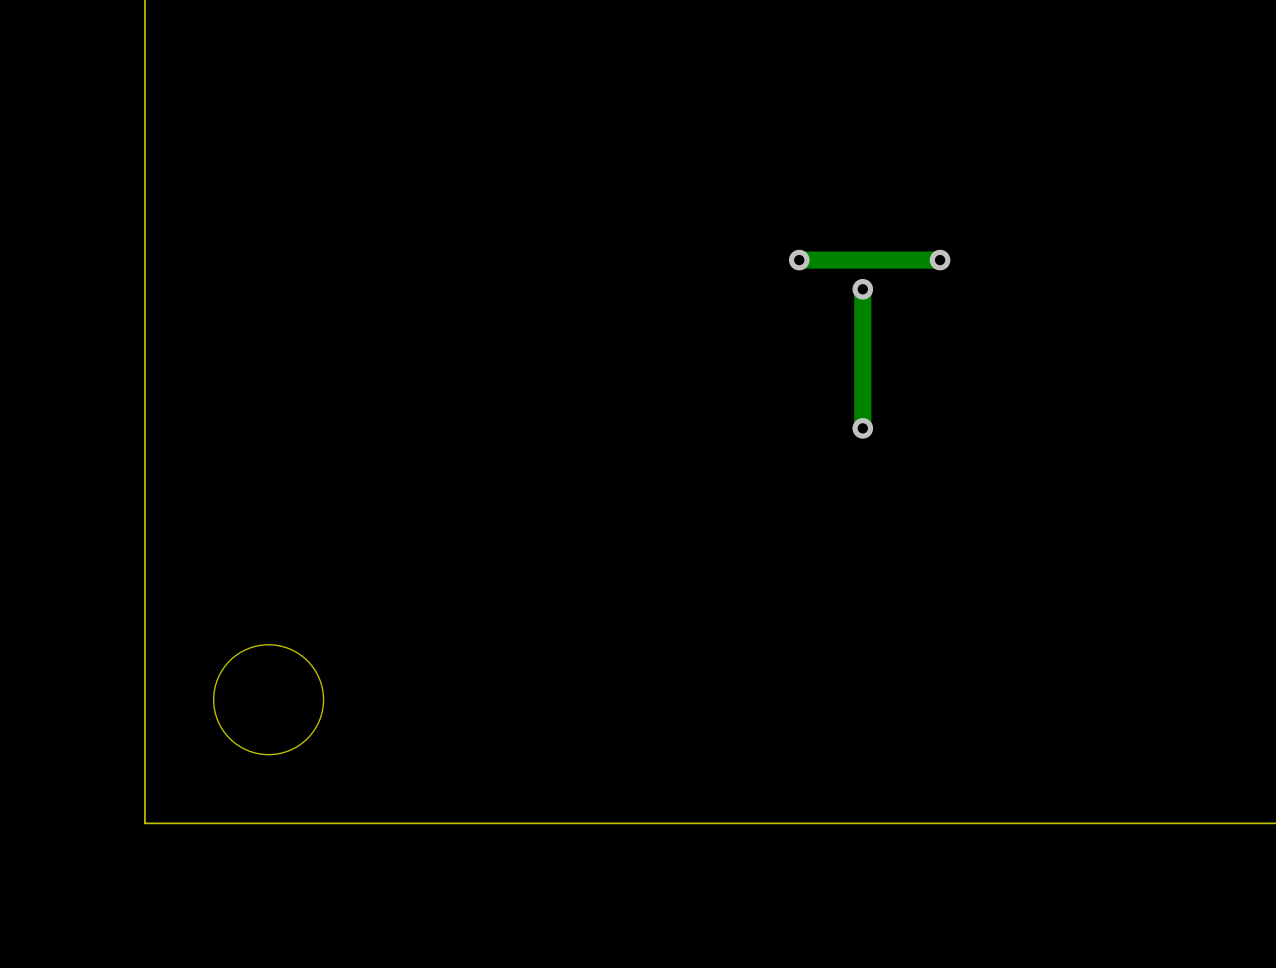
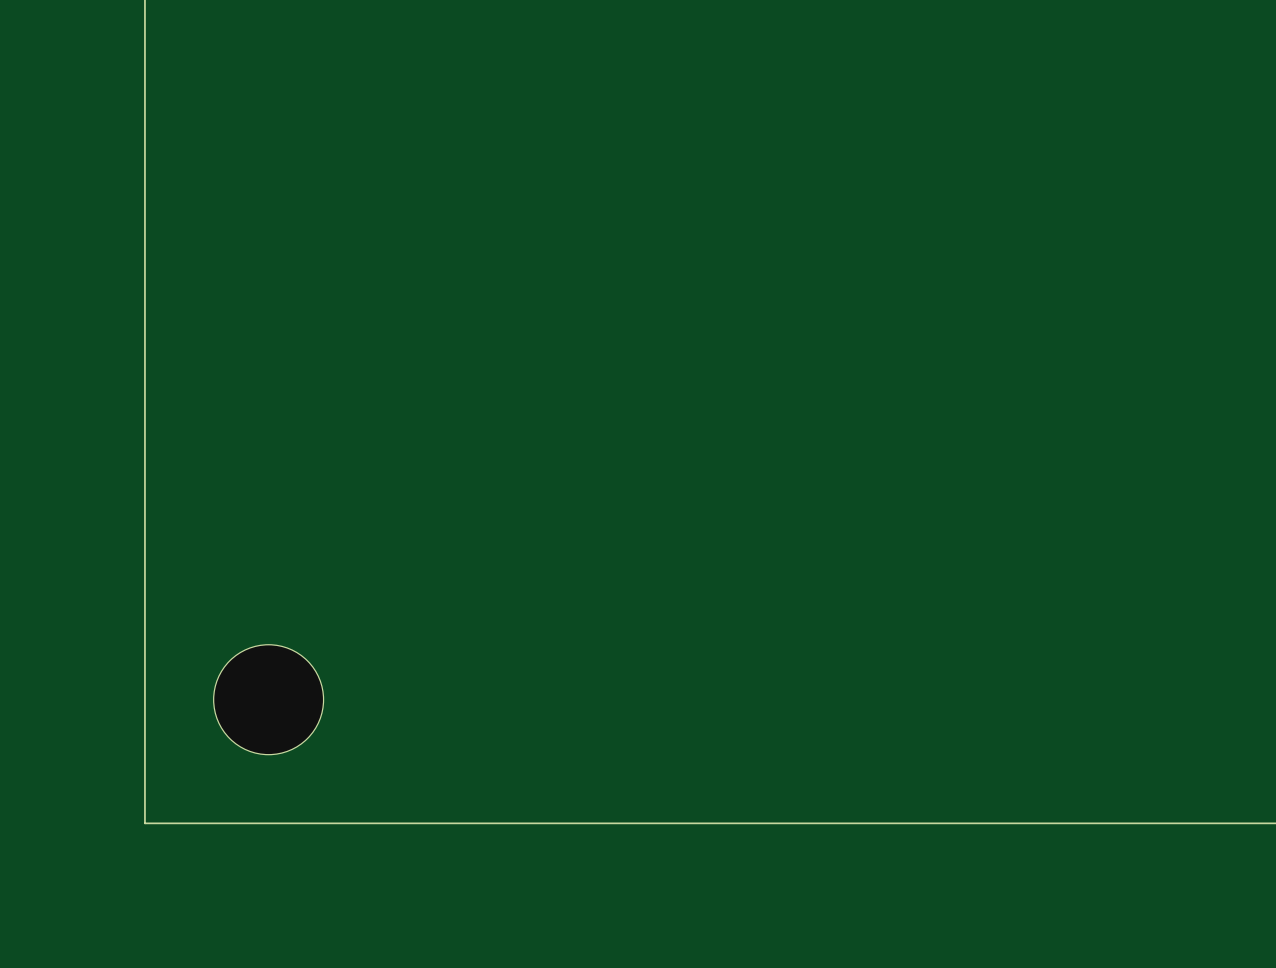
via: (799, 260) -> none
track: (940, 260) (799, 260) -> none
via: (940, 260) -> none
track: (862, 289) (862, 428) -> none
via: (862, 289) -> none
via: (862, 428) -> none

